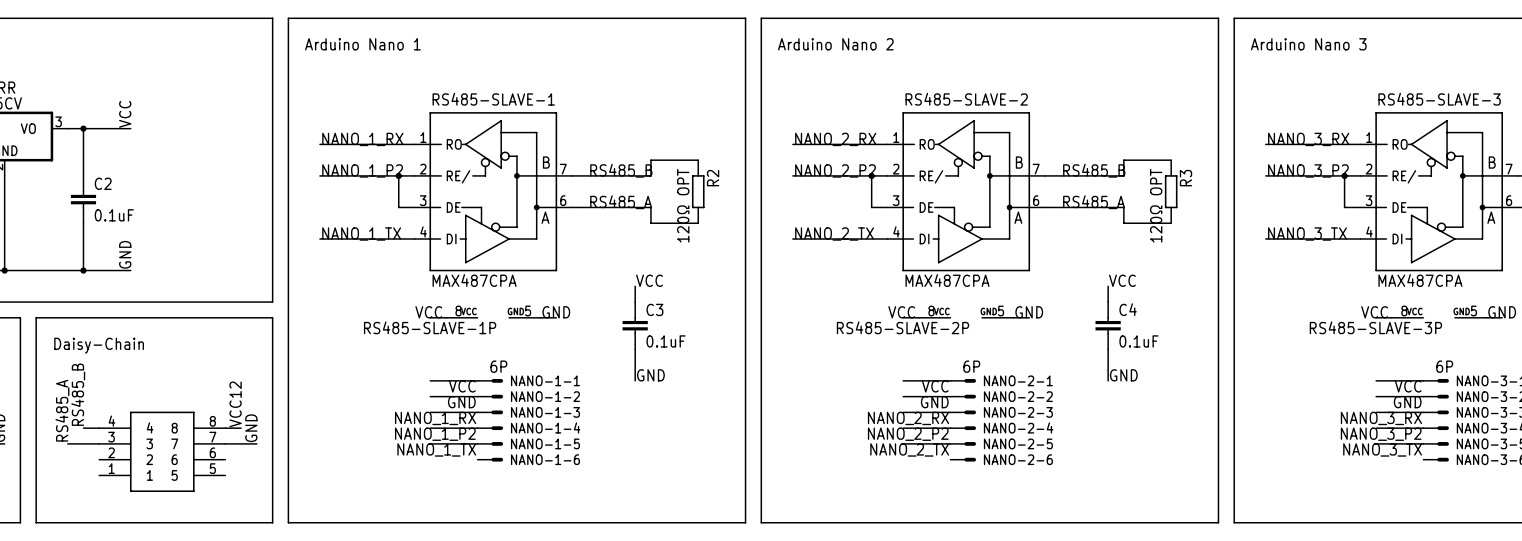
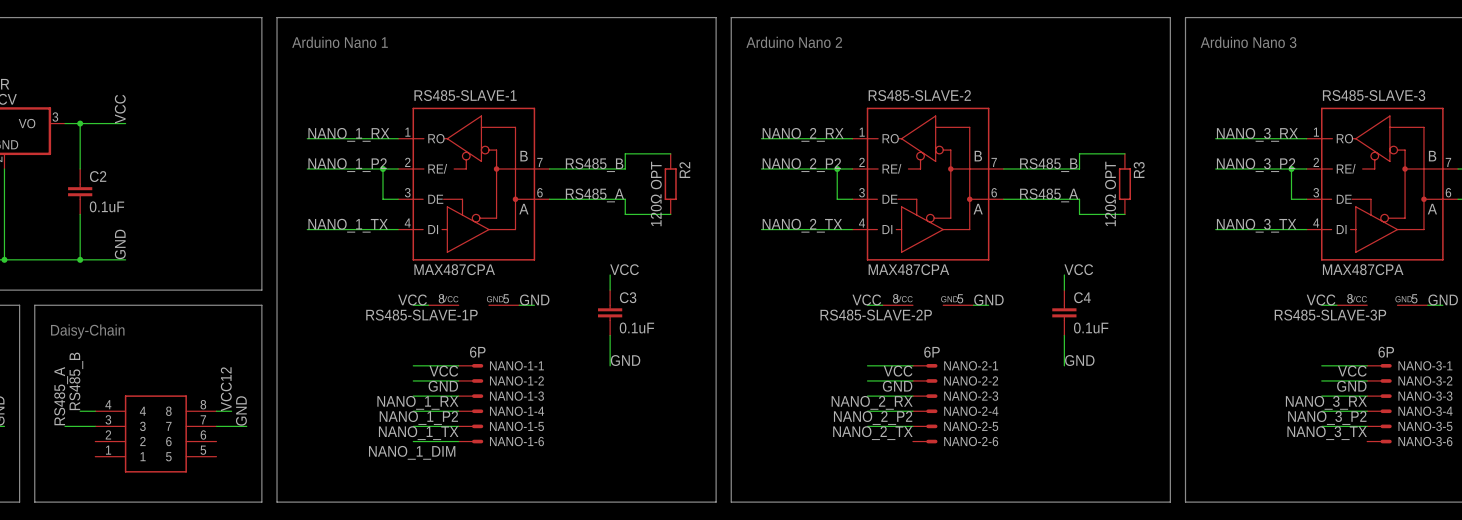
wire: none -> (413, 441) (458, 441)
label: none -> NANO_1_DIM (412, 452)

